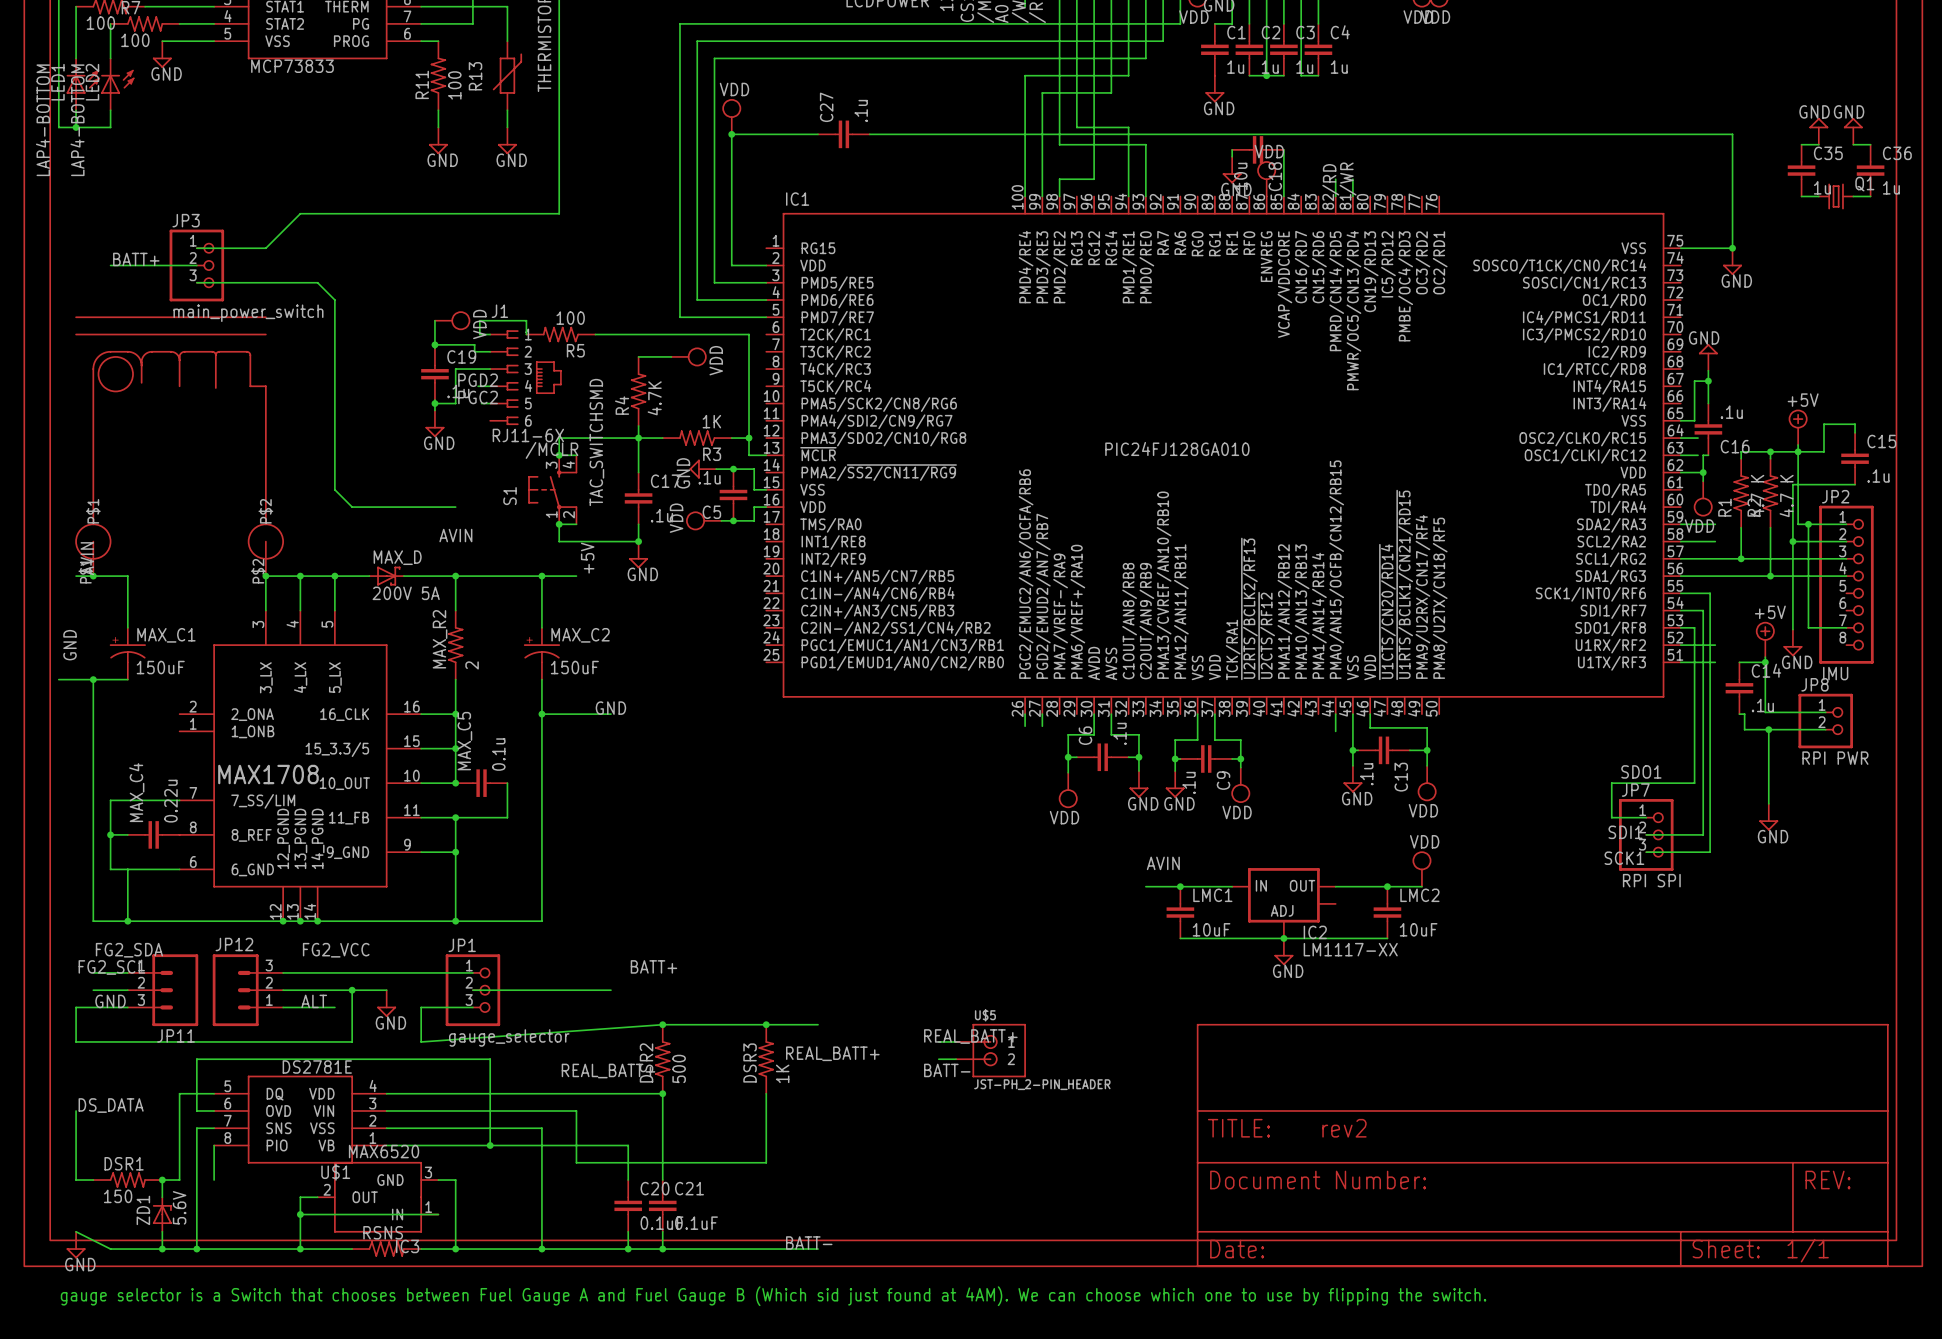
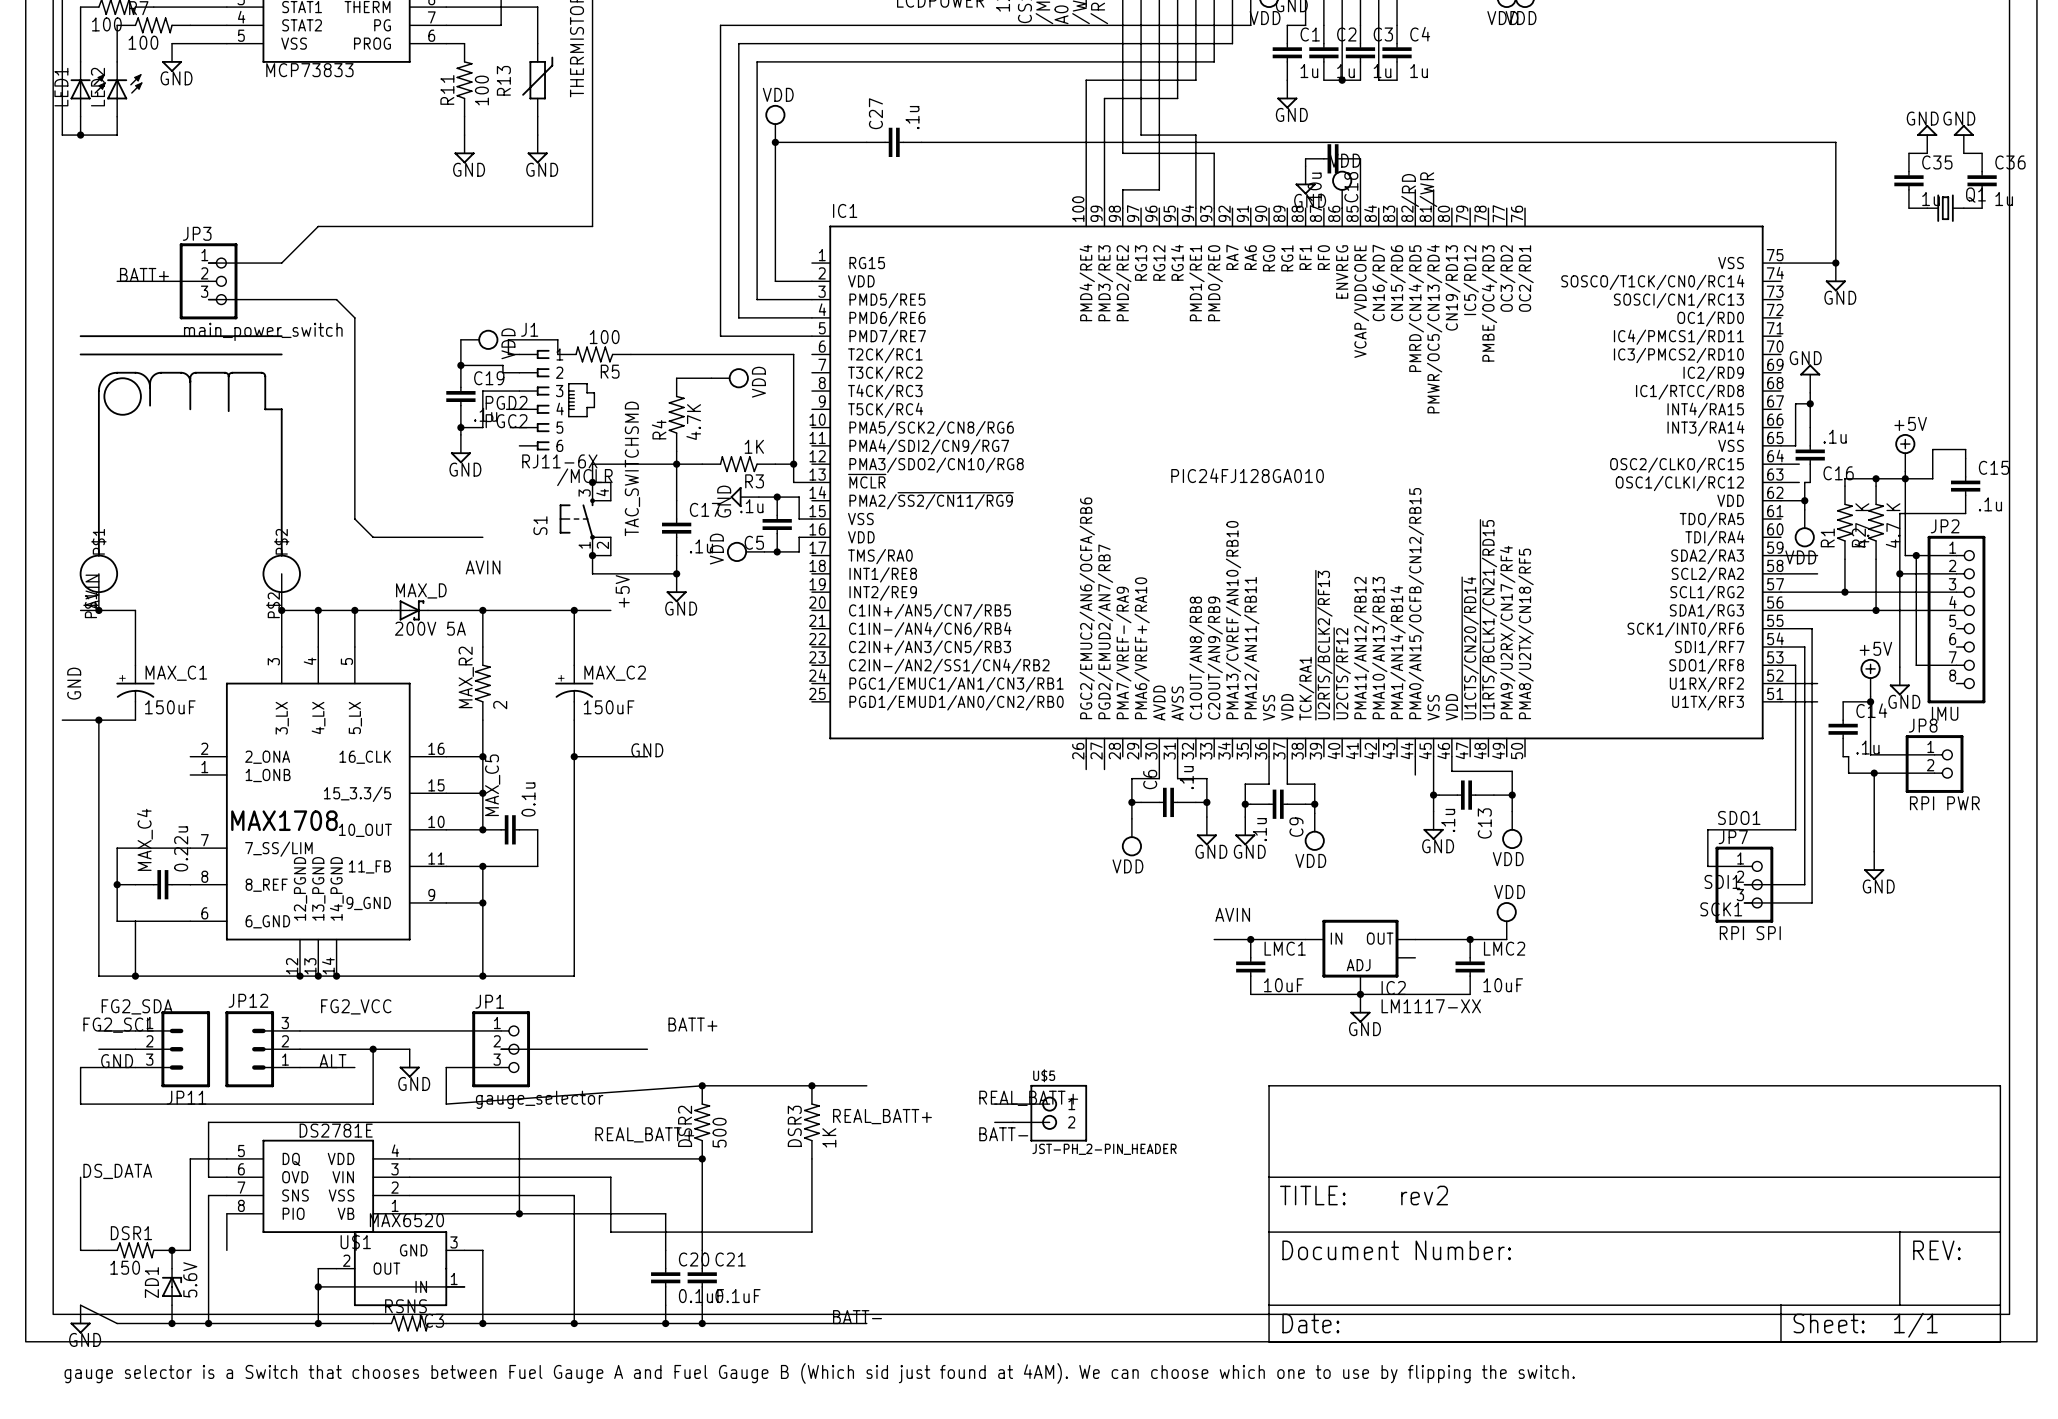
LED1 value: LAP4-BOTTOM (42, 120) -> none
LED2 value: LAP4-BOTTOM (77, 120) -> none

